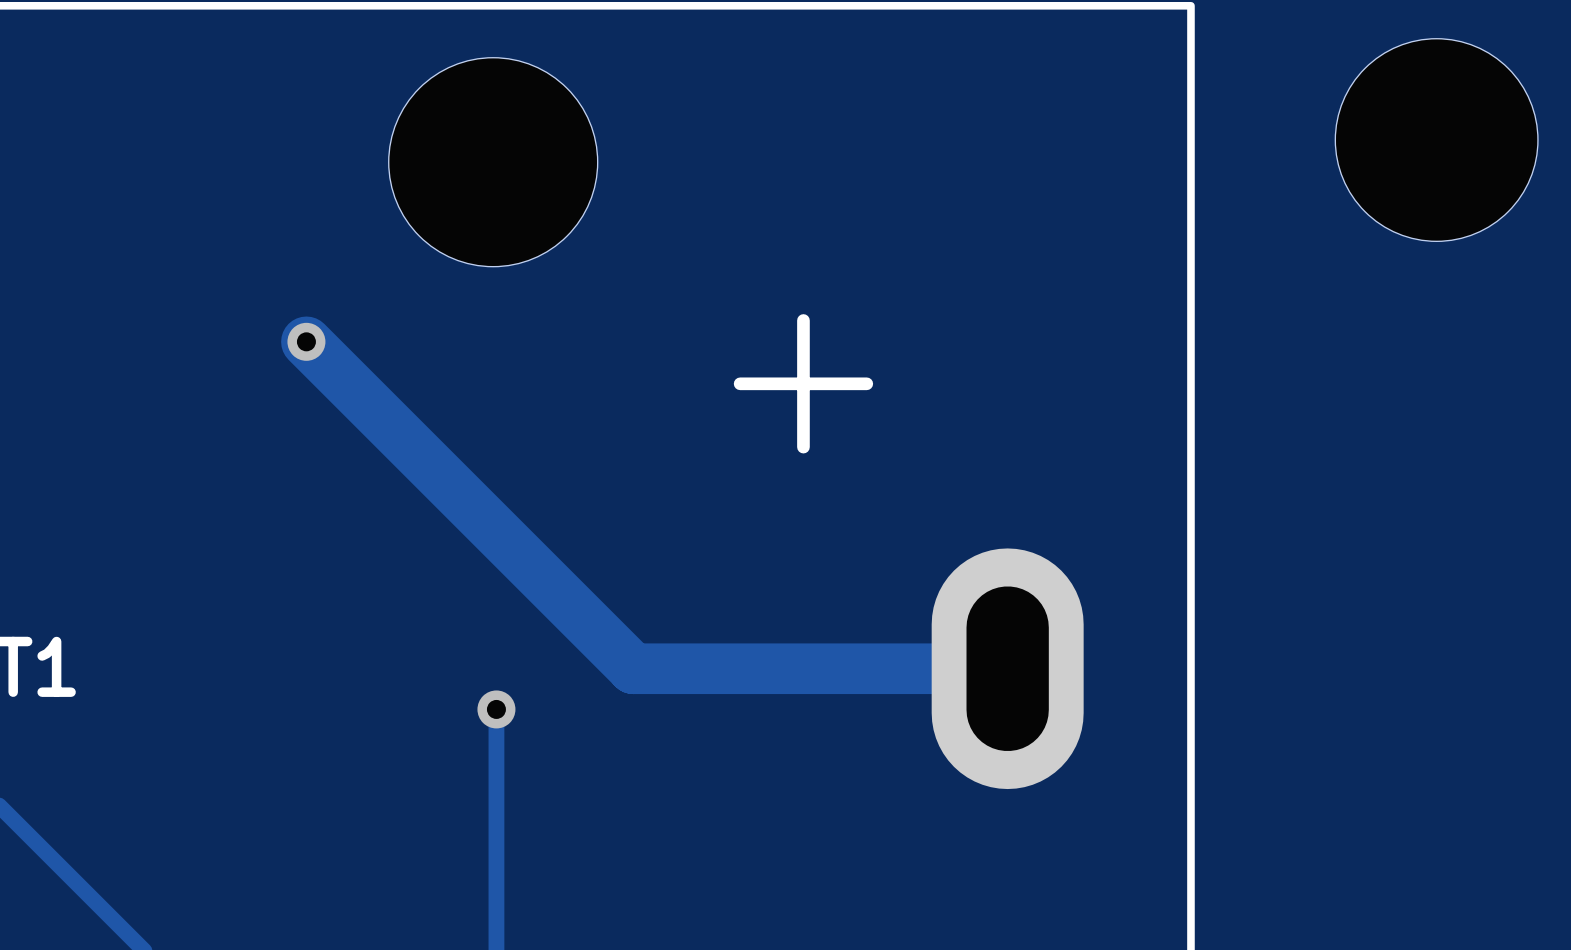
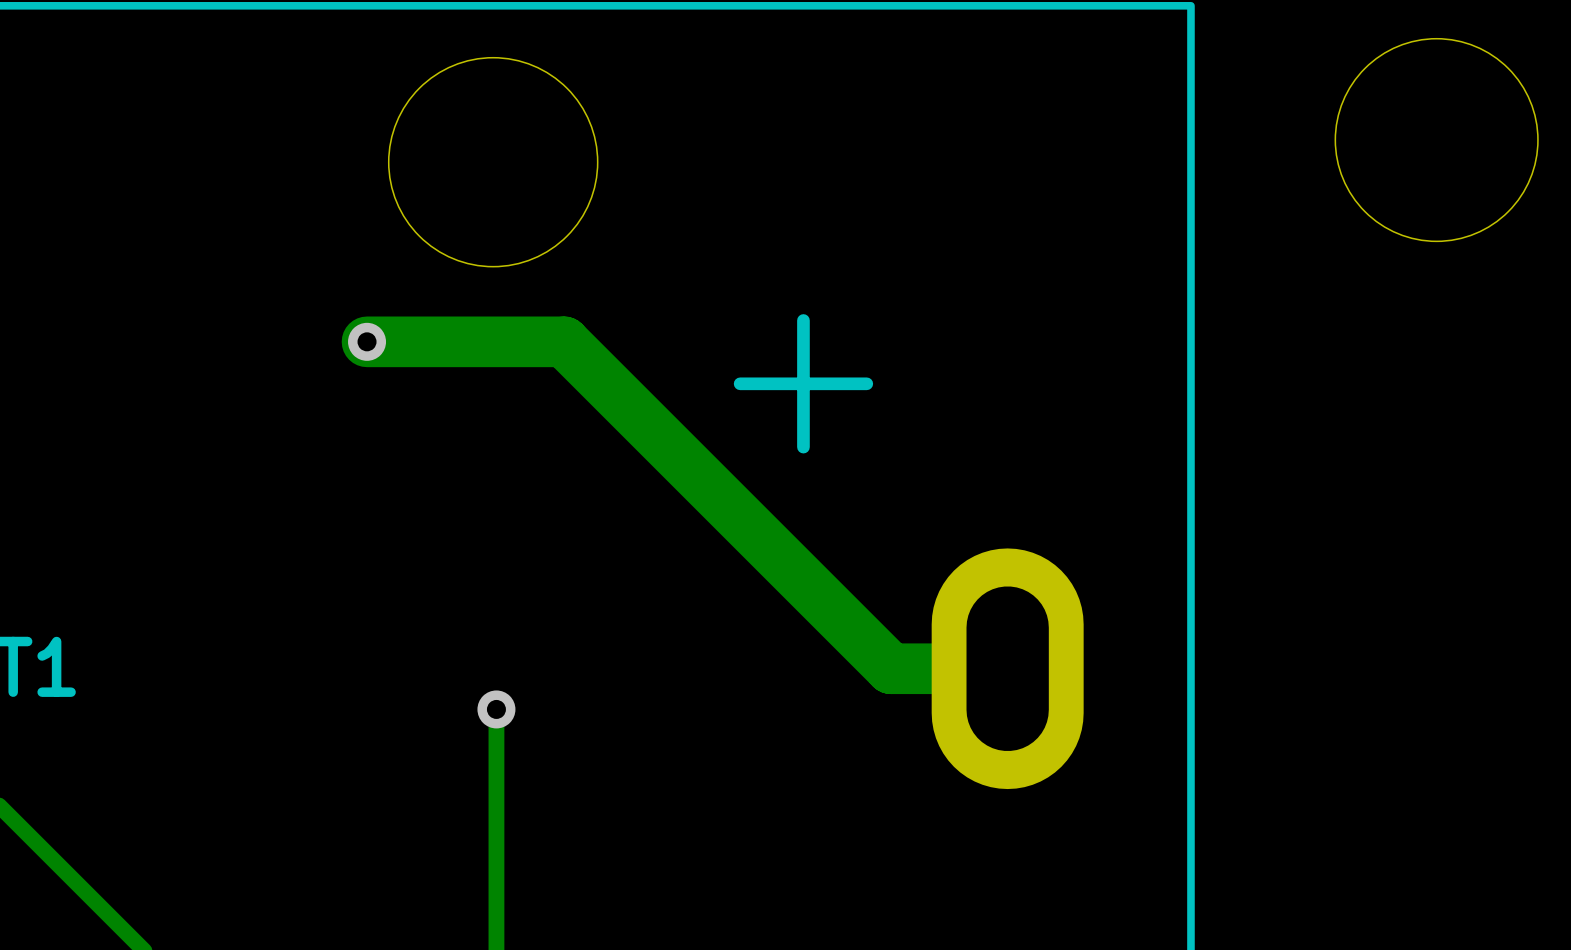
track: (306, 341) (633, 668) (891, 668) -> (367, 341) (564, 341) (891, 668)
via position: (306, 341) -> (367, 341)

